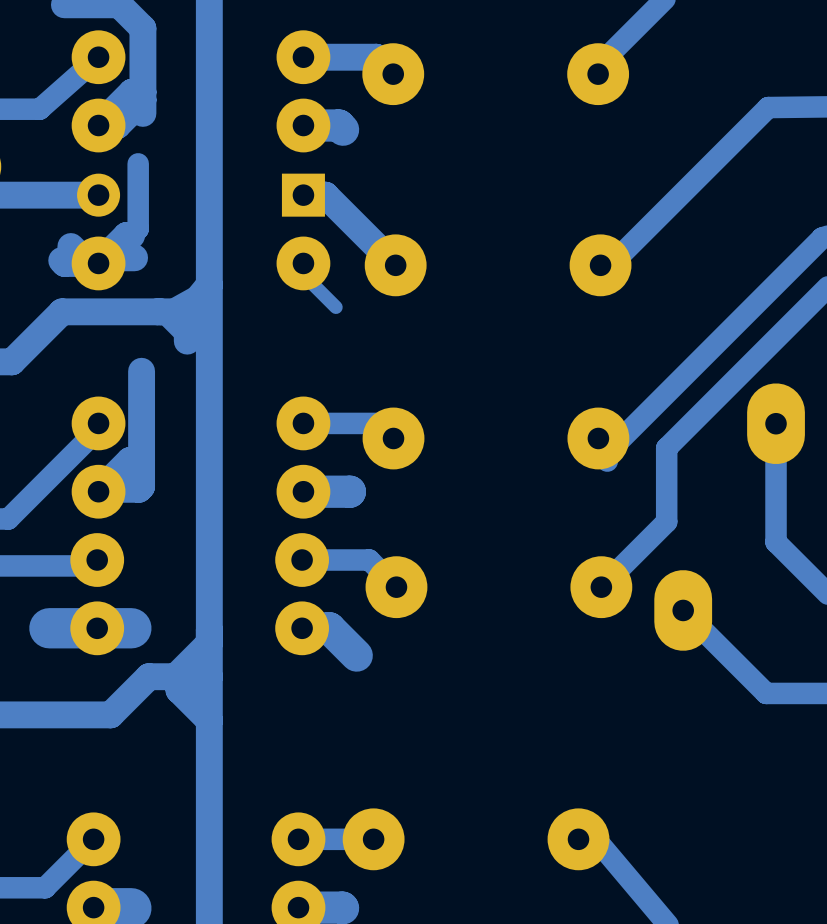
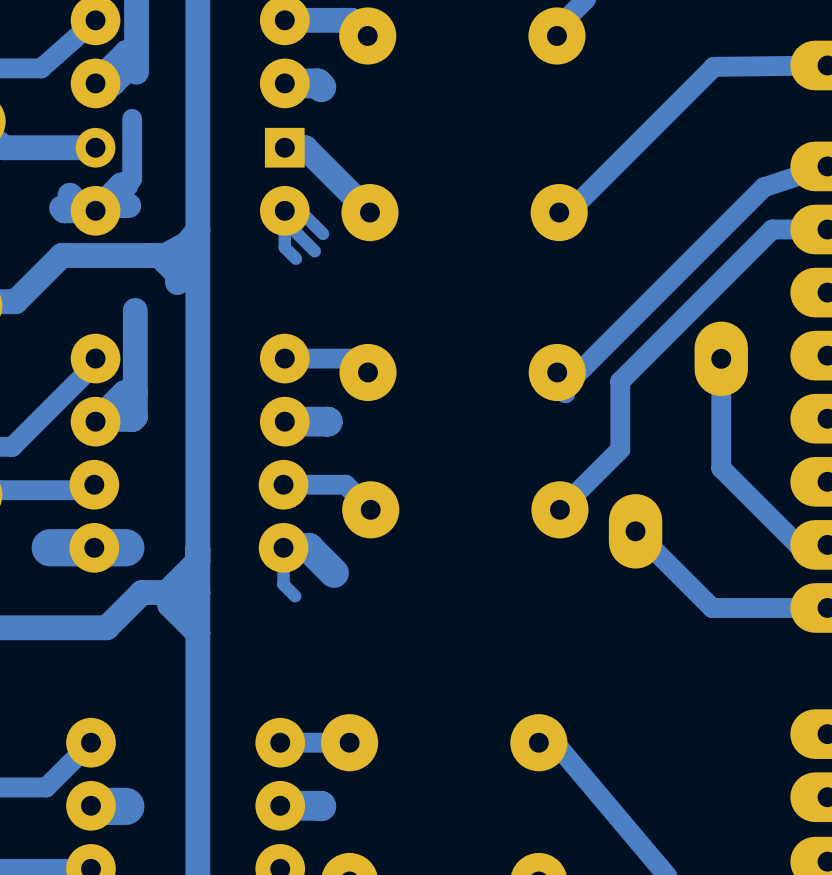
track: none -> (284, 210) (299, 210) (323, 233)
track: none -> (284, 221) (284, 247) (295, 258)
track: none -> (283, 547) (283, 584) (295, 596)

